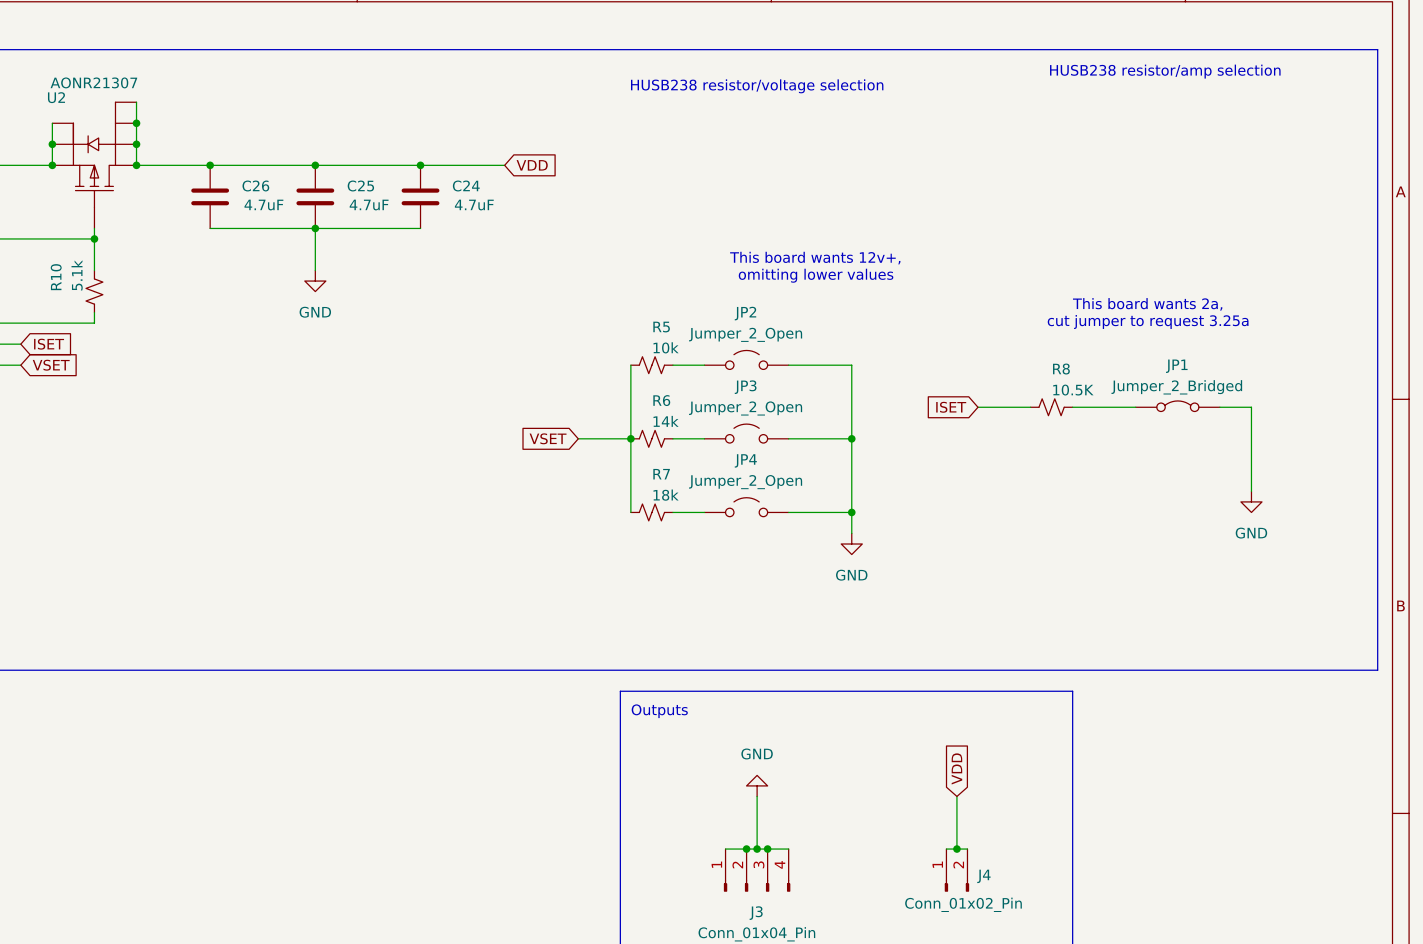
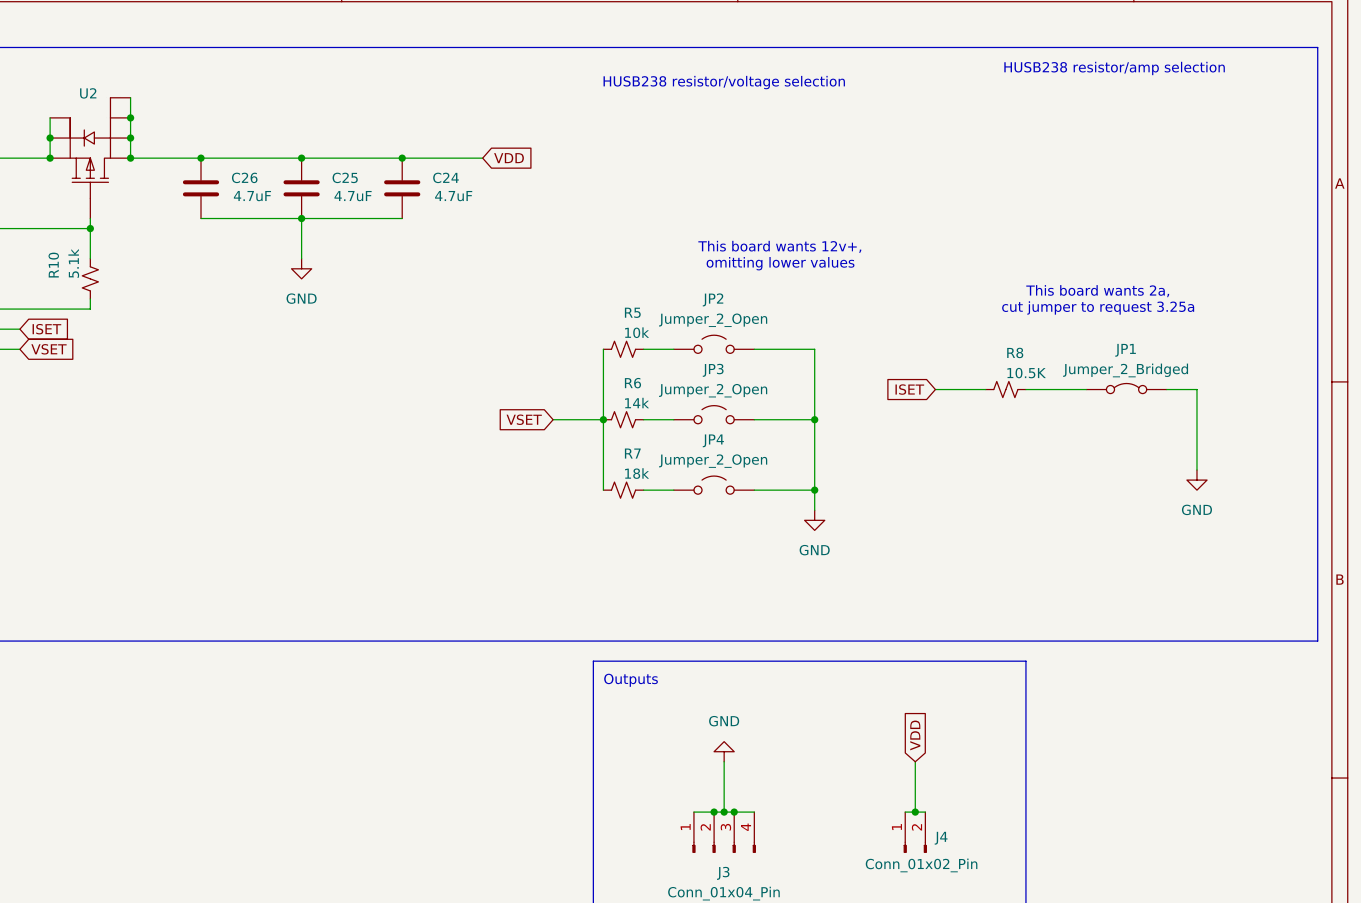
U2 value: AONR21307 (93, 82) -> none
U2 name position: U2 (56, 97) -> U2 (88, 93)

